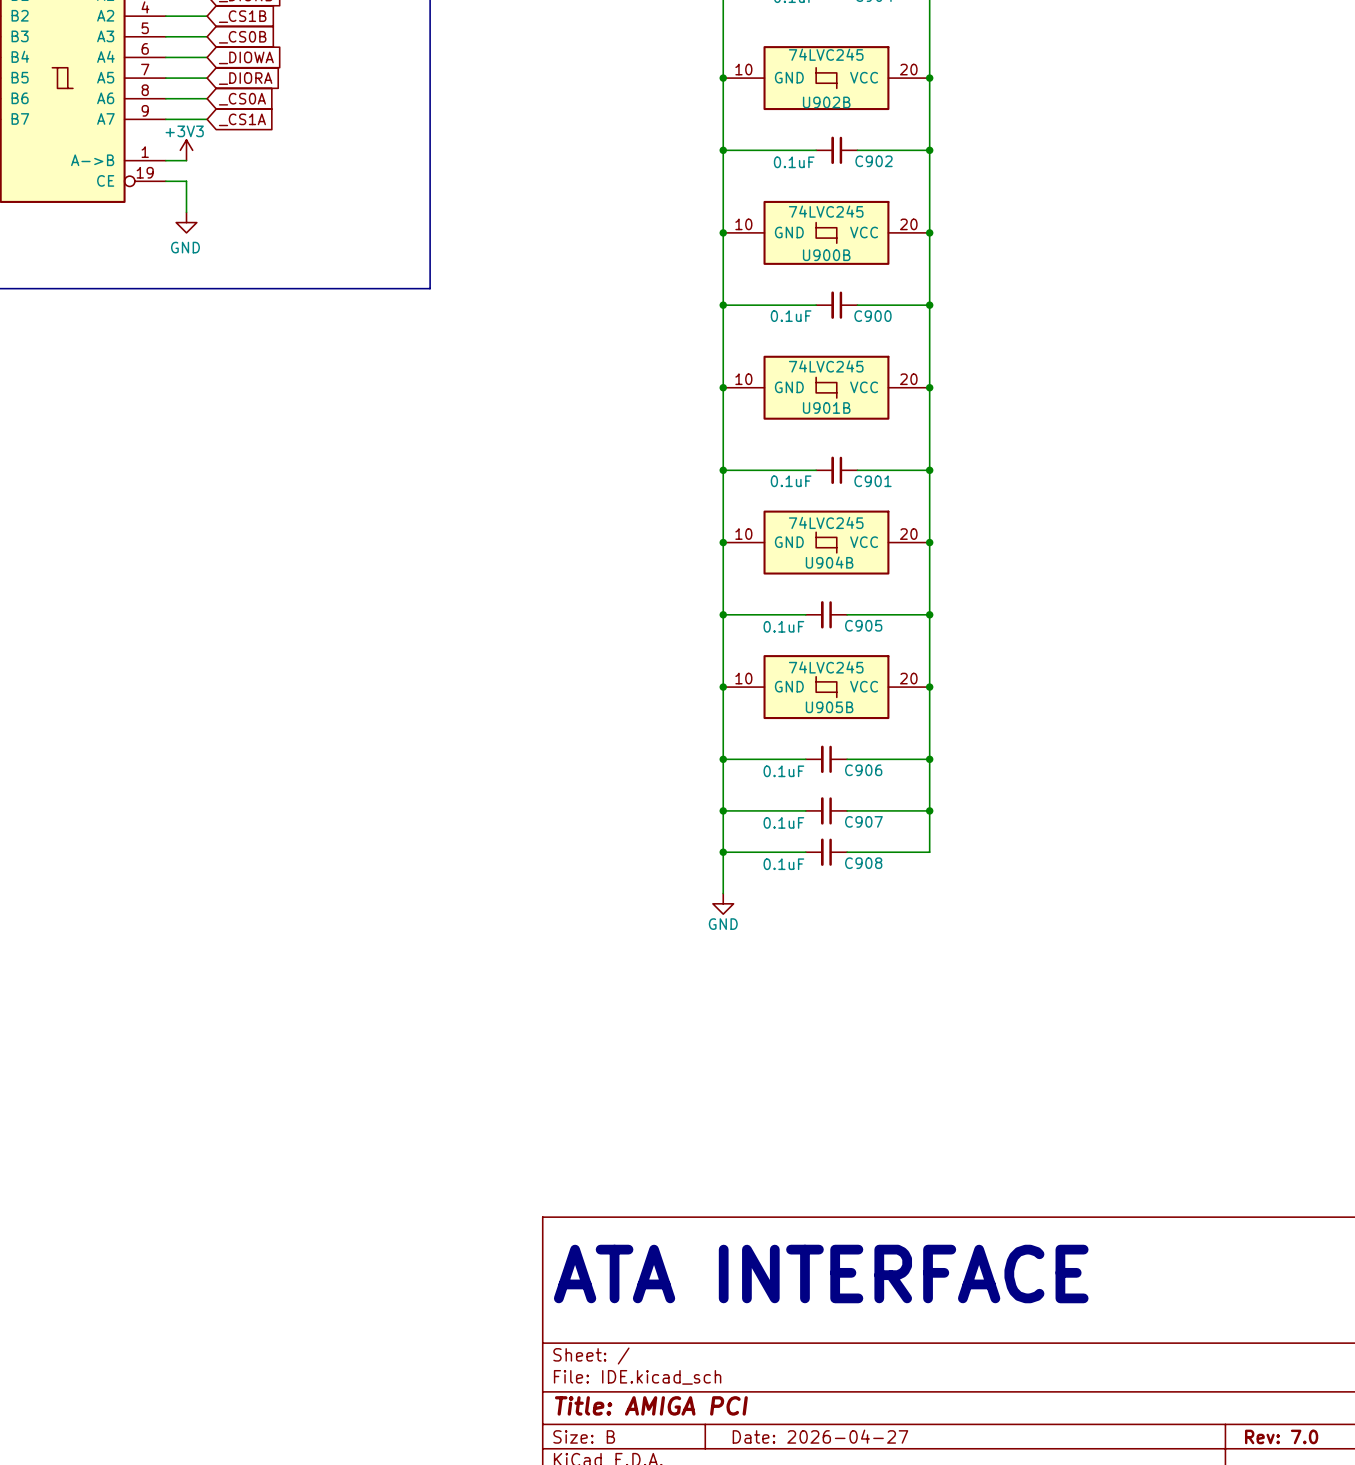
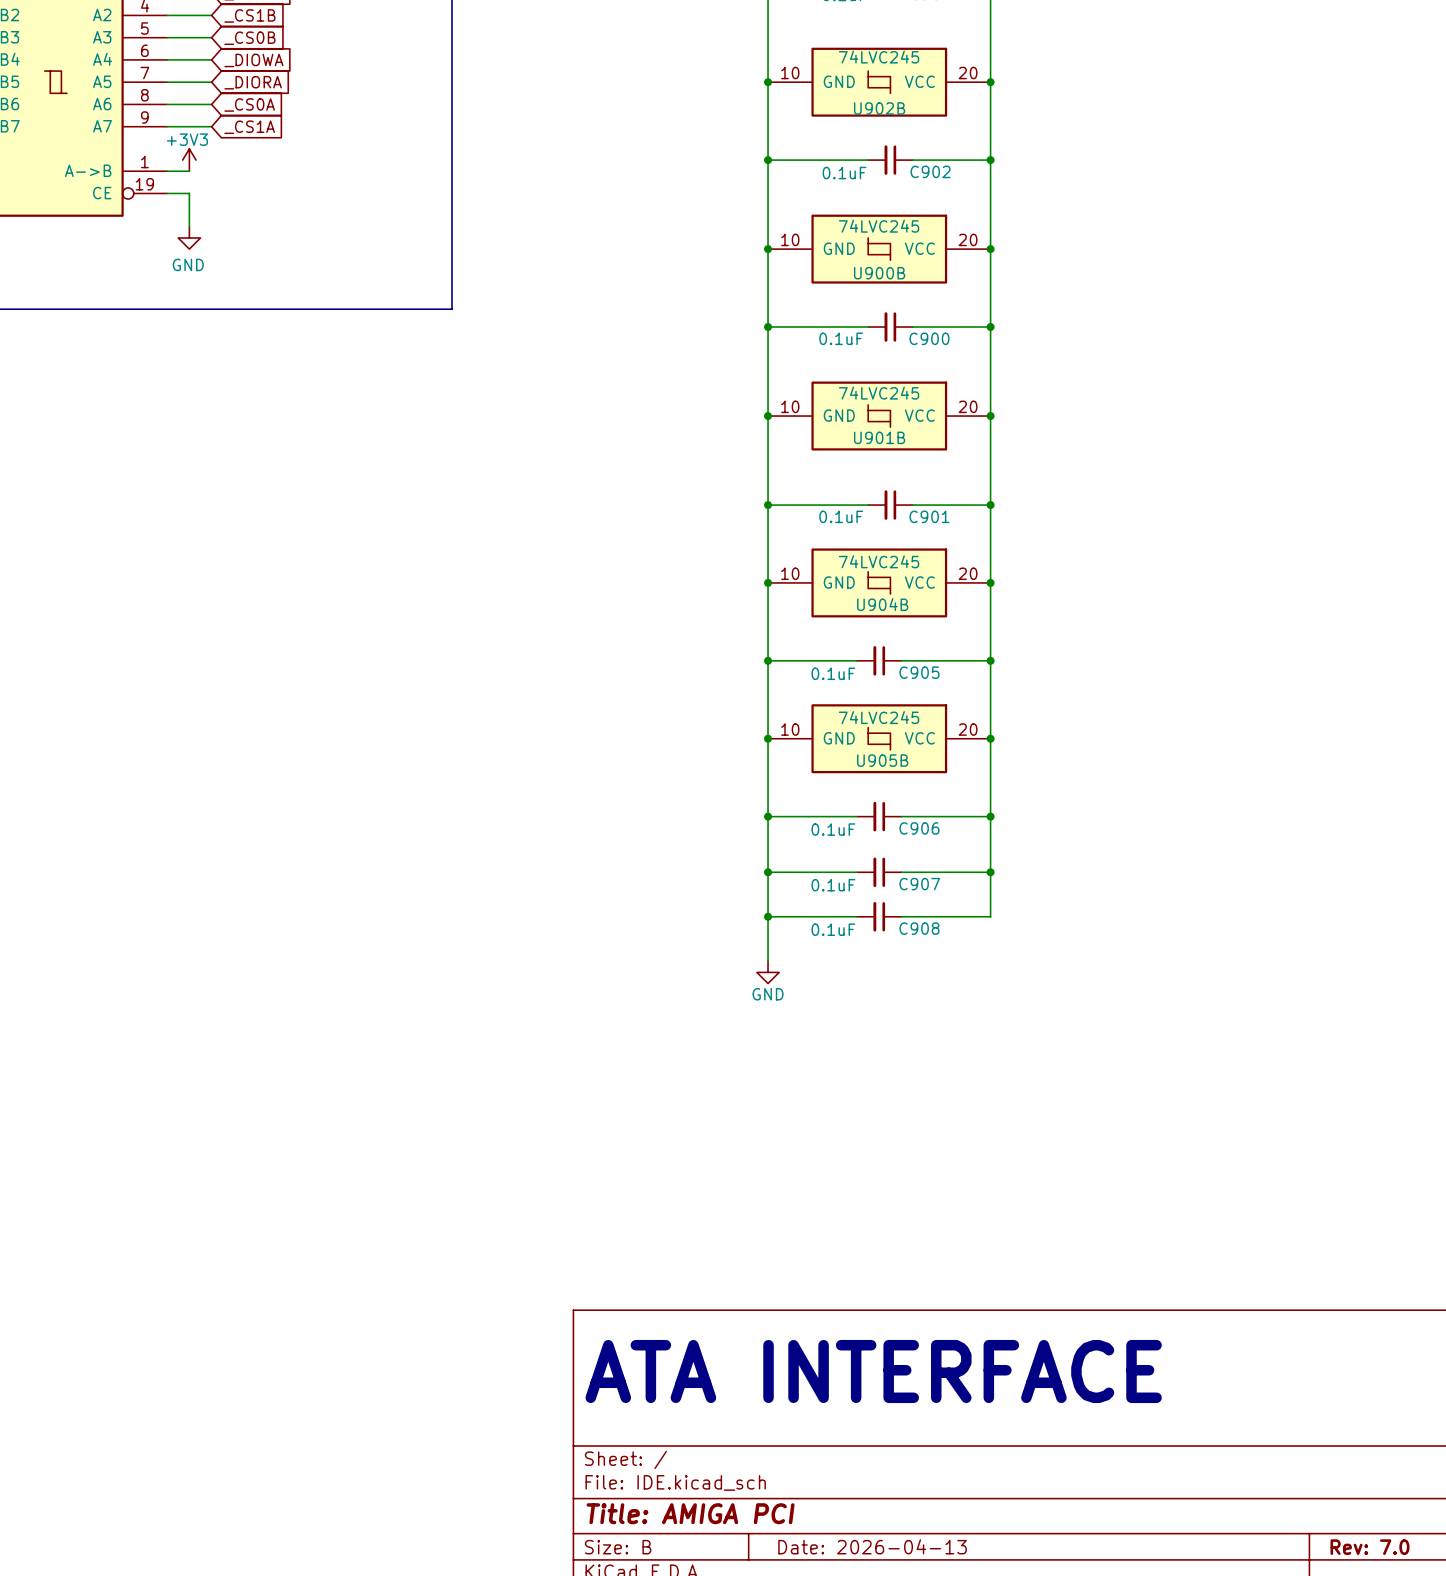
title block: Date: 2026-04-27 (820, 1436) -> Date: 2026-04-13 (872, 1546)

